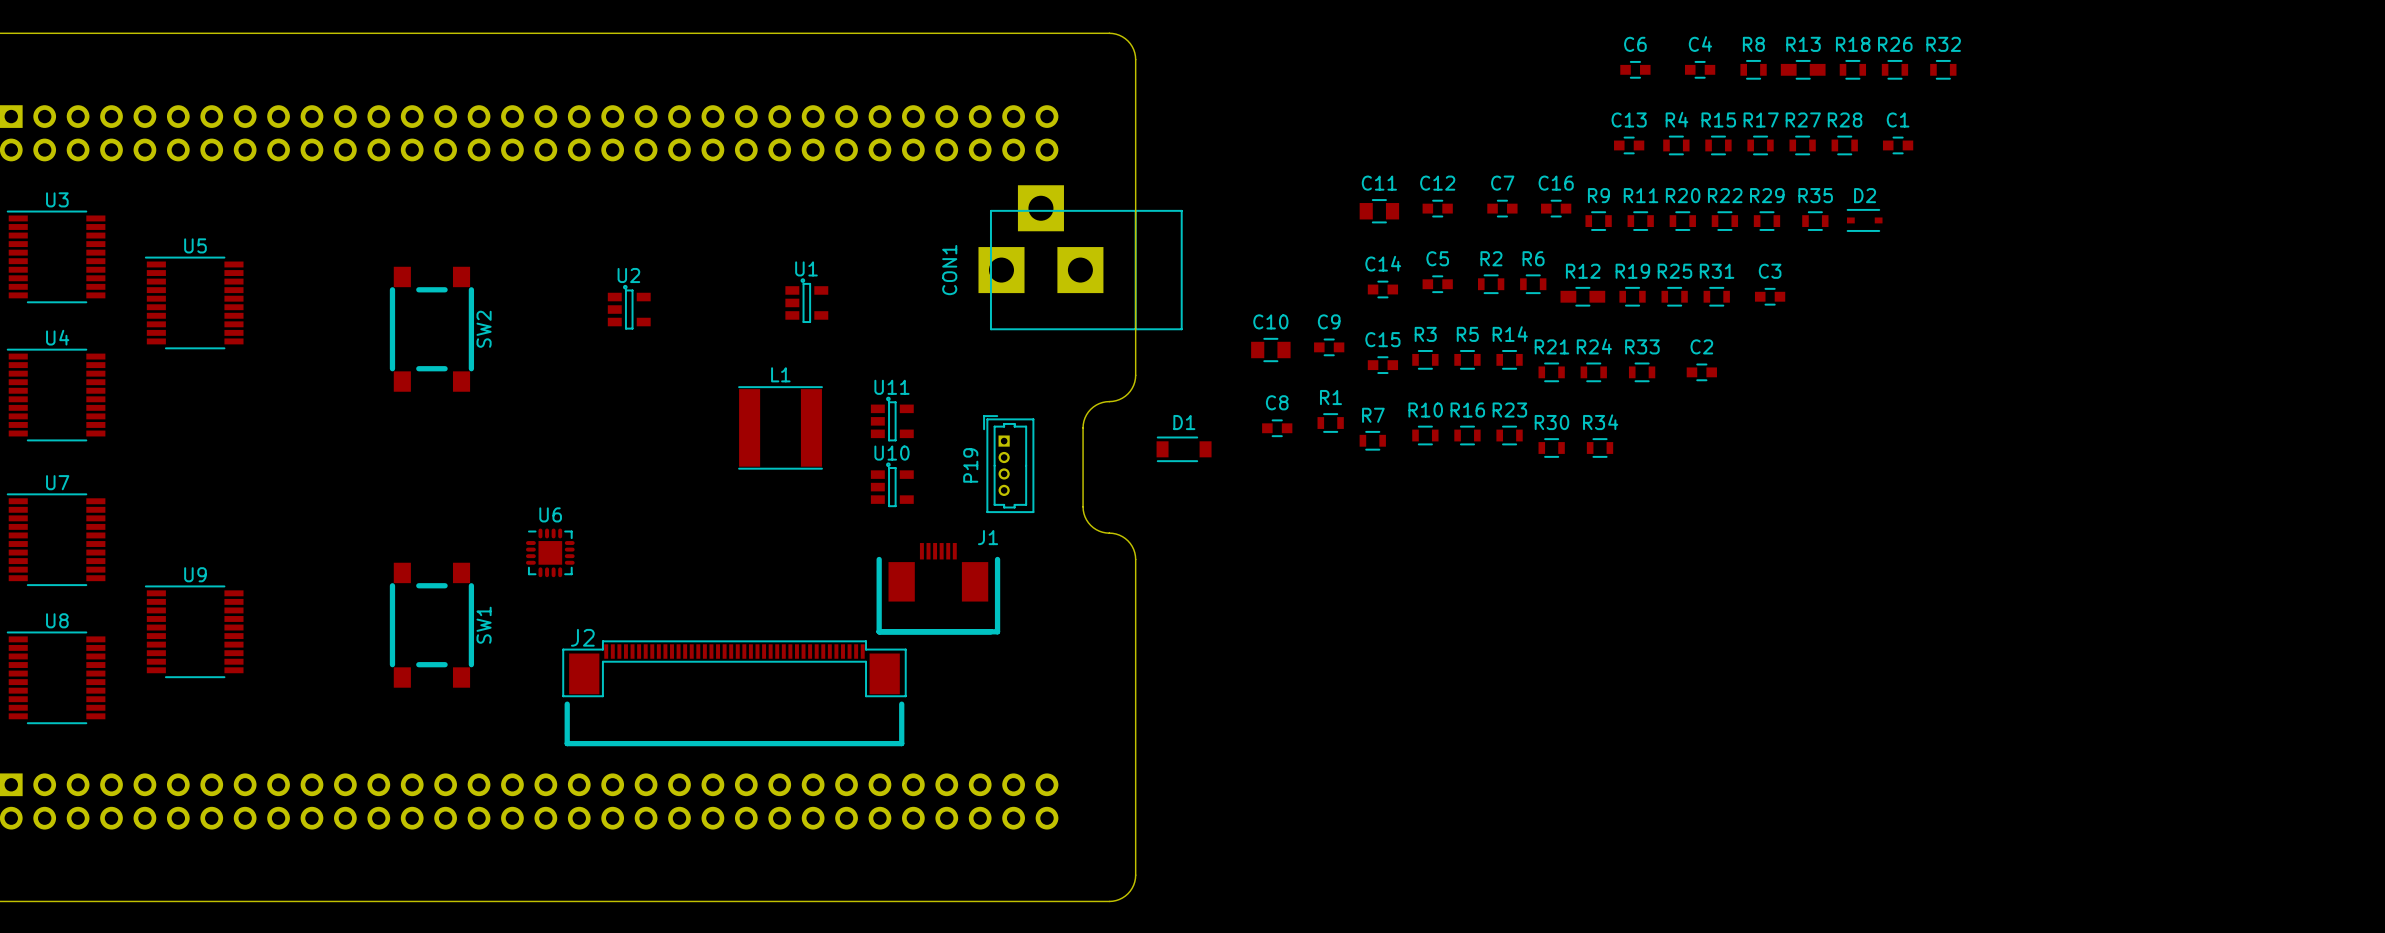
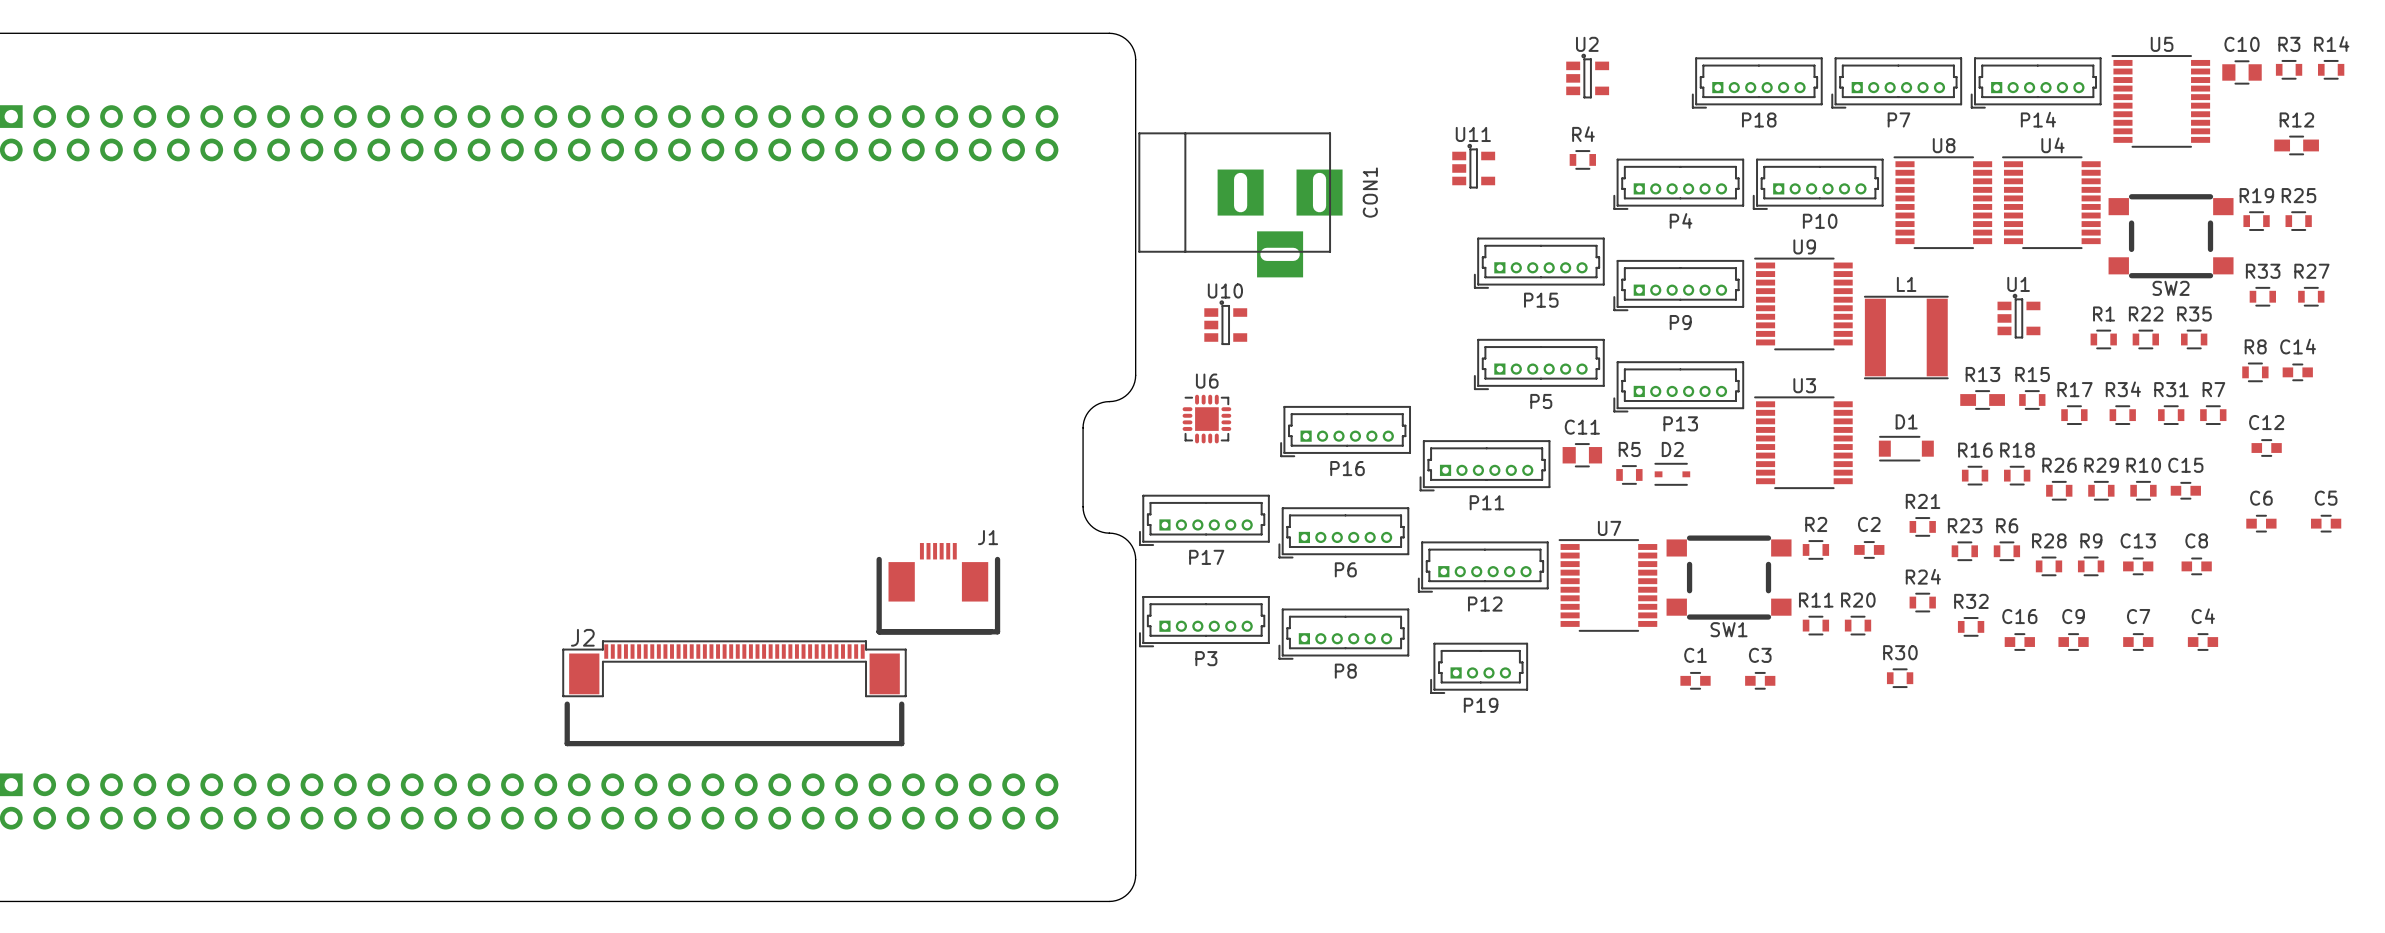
C6 position: (1635, 69) -> (2261, 523)
C4 position: (1700, 69) -> (2203, 642)
R8 position: (1753, 69) -> (2255, 372)
R13 position: (1803, 69) -> (1982, 399)
R18 position: (1852, 69) -> (2017, 475)
R26 position: (1894, 69) -> (2059, 490)
R32 position: (1943, 69) -> (1971, 626)
P18: none -> (1757, 82)
P7: none -> (1896, 82)
P14: none -> (2036, 82)
C13 position: (1629, 145) -> (2138, 566)
R4 position: (1676, 145) -> (1582, 159)
R15 position: (1718, 145) -> (2032, 399)
R17 position: (1760, 145) -> (2074, 415)
R27 position: (1802, 145) -> (2311, 296)
R28 position: (1844, 145) -> (2049, 566)
C1 position: (1898, 145) -> (1695, 680)
P4: none -> (1678, 184)
P10: none -> (1818, 184)
CON1 footprint: [978, 185, 1183, 331] -> [1138, 132, 1343, 278]
C12 position: (1437, 208) -> (2266, 448)
C7 position: (1502, 208) -> (2138, 642)
C16 position: (1556, 208) -> (2019, 642)
C11 position: (1379, 211) -> (1582, 455)
D2 position: (1864, 220) -> (1672, 474)
R9 position: (1598, 221) -> (2091, 566)
R11 position: (1640, 221) -> (1815, 625)
R20 position: (1682, 221) -> (1858, 625)
R22 position: (1724, 221) -> (2145, 339)
R29 position: (1766, 221) -> (2101, 490)
R35 position: (1815, 221) -> (2194, 339)
U3 position: (56, 256) -> (1803, 442)
P15: none -> (1539, 263)
CON1 name position: CON1 (949, 270) -> CON1 (1370, 192)
C5 position: (1437, 284) -> (2326, 523)
R2 position: (1491, 284) -> (1815, 549)
R6 position: (1533, 284) -> (2006, 551)
P9: none -> (1678, 285)
C14 position: (1382, 289) -> (2297, 372)
R12 position: (1582, 296) -> (2296, 145)
R19 position: (1632, 296) -> (2256, 221)
R25 position: (1674, 296) -> (2298, 221)
R31 position: (1716, 296) -> (2171, 415)
C3 position: (1770, 296) -> (1760, 680)
U1 position: (806, 300) -> (2018, 316)
U5 position: (194, 302) -> (2160, 101)
U2 position: (629, 307) -> (1587, 76)
SW2 rotation: 0° (431, 329) -> 90° clockwise (2171, 236)
SW2 position: (431, 329) -> (2171, 236)
C9 position: (1329, 347) -> (2073, 642)
C10 position: (1270, 350) -> (2242, 72)
R3 position: (1425, 359) -> (2289, 69)
R5 position: (1467, 359) -> (1629, 474)
R14 position: (1509, 359) -> (2331, 69)
P5: none -> (1539, 364)
C15 position: (1382, 365) -> (2185, 490)
R21 position: (1551, 372) -> (1922, 526)
R24 position: (1593, 372) -> (1922, 602)
R33 position: (1642, 372) -> (2262, 296)
C2 position: (1701, 372) -> (1869, 549)
P13: none -> (1678, 386)
U4 position: (56, 395) -> (2051, 202)
U11 position: (892, 419) -> (1473, 166)
R1 position: (1330, 423) -> (2103, 339)
L1 position: (780, 427) -> (1906, 337)
C8 position: (1277, 428) -> (2196, 566)
P16: none -> (1345, 431)
R10 position: (1425, 435) -> (2143, 490)
R16 position: (1467, 435) -> (1975, 475)
R23 position: (1509, 435) -> (1964, 551)
R7 position: (1372, 440) -> (2213, 415)
R30 position: (1551, 448) -> (1900, 678)
R34 position: (1600, 448) -> (2122, 415)
D1 position: (1184, 449) -> (1906, 448)
P19 rotation: 0° (1008, 464) -> 90° counterclockwise (1479, 668)
P19 position: (1008, 464) -> (1479, 668)
P11: none -> (1485, 465)
U10 position: (892, 484) -> (1225, 322)
P17: none -> (1204, 520)
P6: none -> (1343, 532)
U7 position: (56, 539) -> (1607, 585)
U6 position: (550, 552) -> (1206, 419)
P12: none -> (1483, 567)
P3: none -> (1204, 621)
SW1 rotation: 0° (431, 625) -> 90° clockwise (1729, 577)
SW1 position: (431, 625) -> (1729, 577)
U9 position: (194, 631) -> (1803, 303)
P8: none -> (1343, 634)
U8 position: (56, 677) -> (1942, 202)

